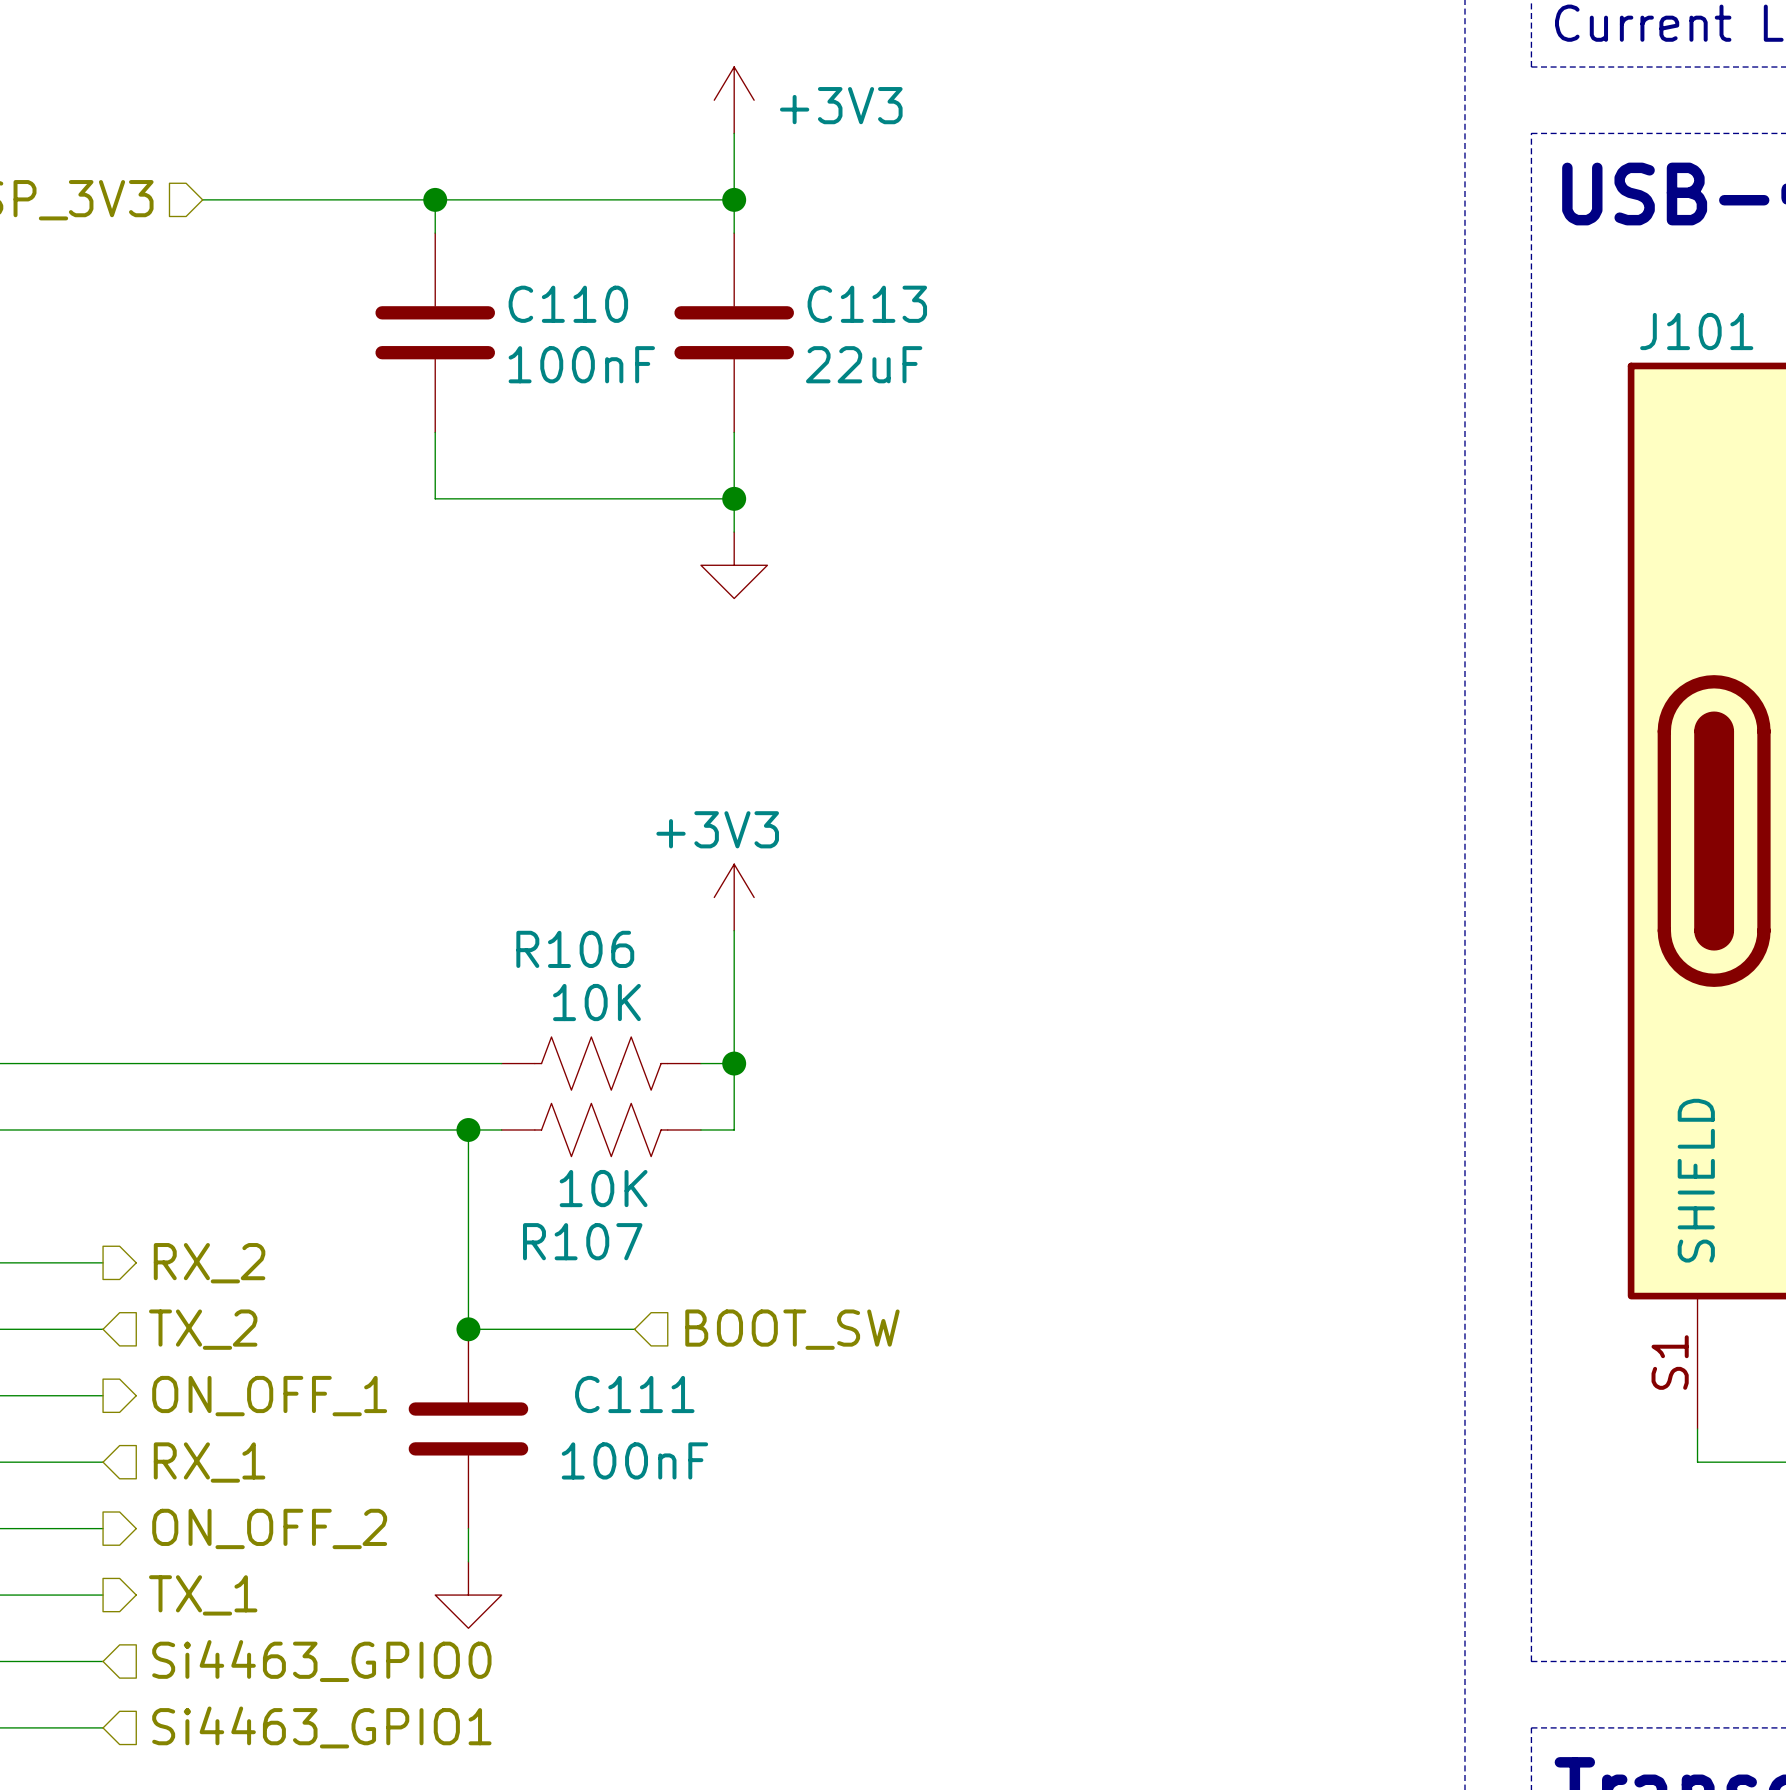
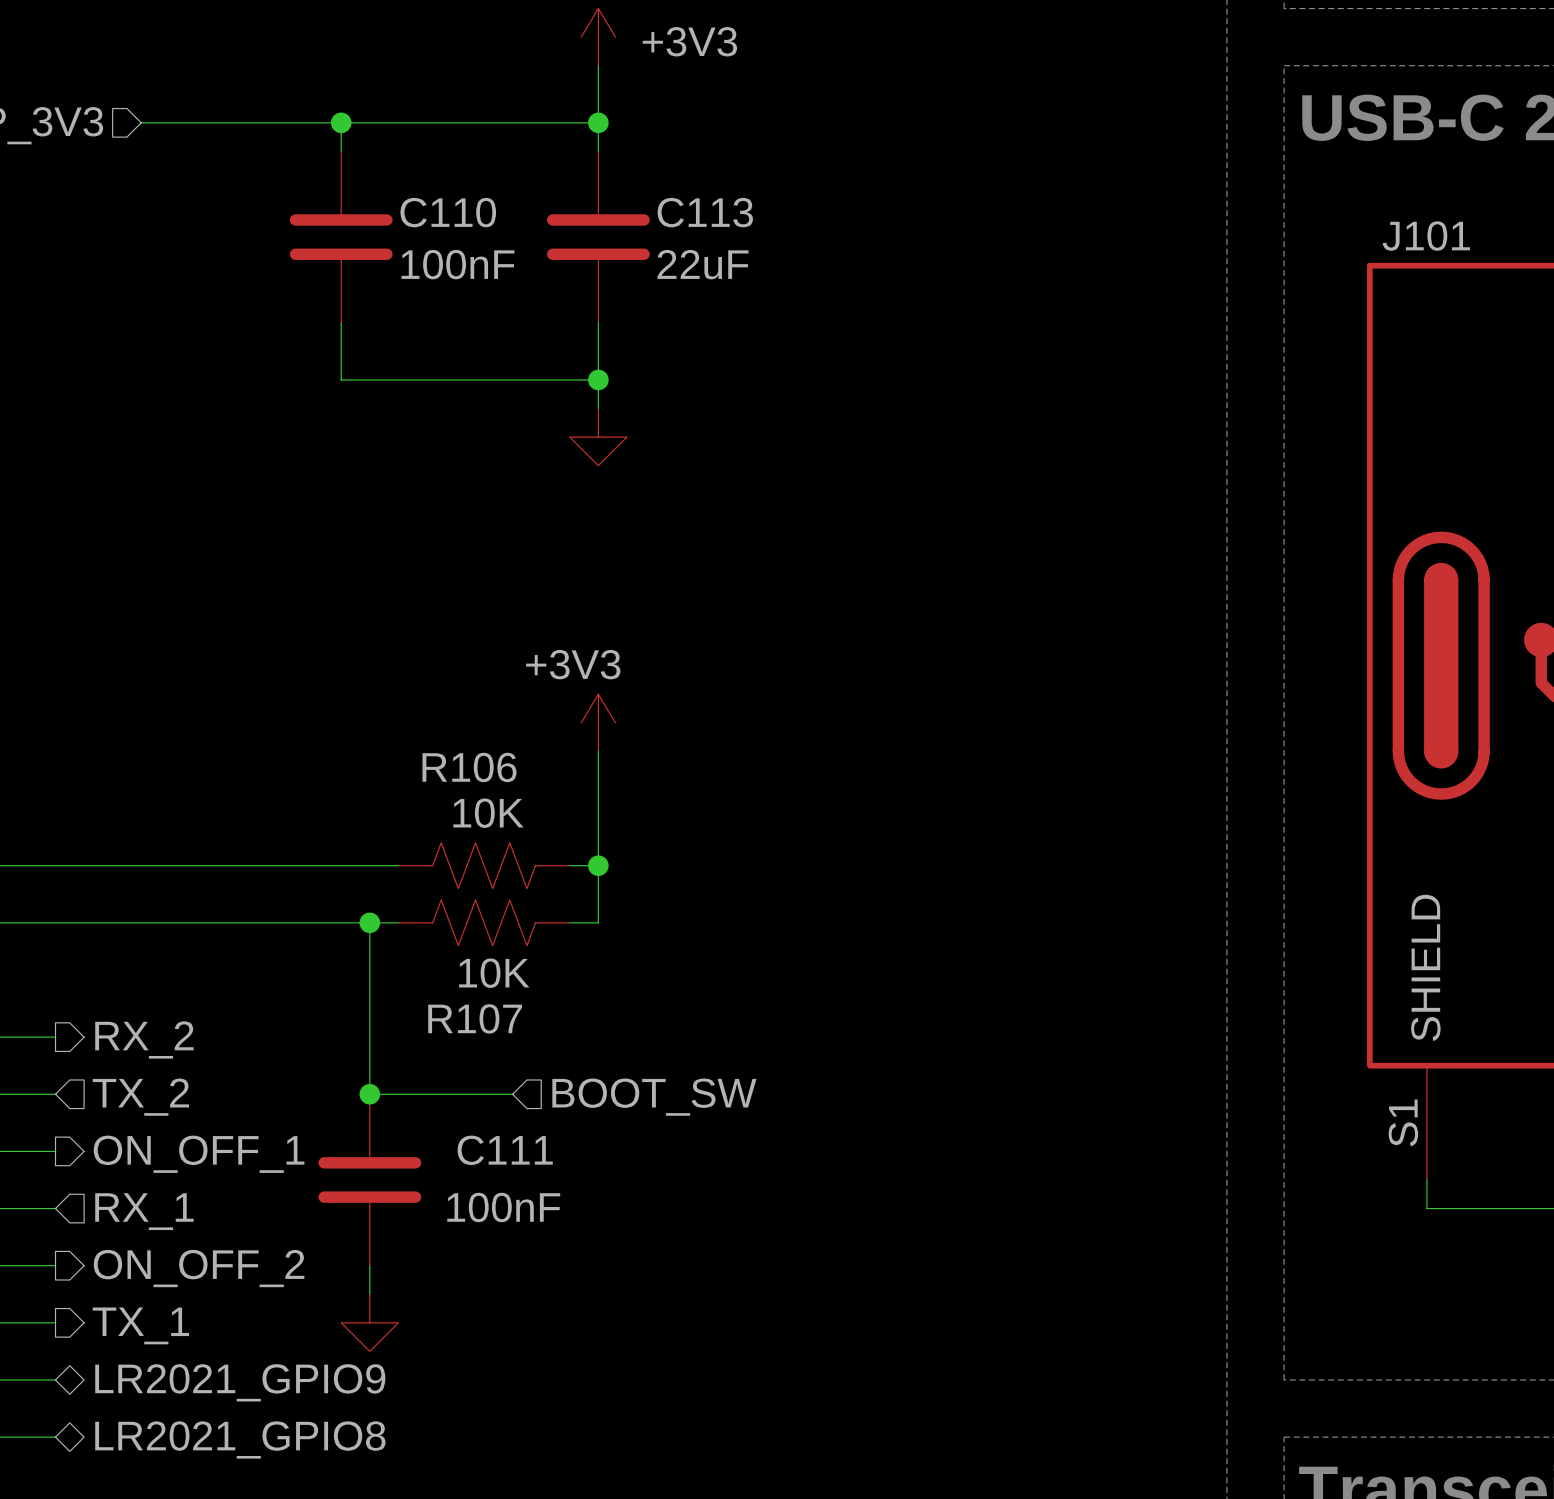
hierarchical label shape: input (321, 1661) -> bidirectional (240, 1382)
hierarchical label: Si4463_GPIO0 (321, 1661) -> LR2021_GPIO9 (240, 1382)
hierarchical label shape: input (321, 1727) -> bidirectional (240, 1439)
hierarchical label: Si4463_GPIO1 (321, 1727) -> LR2021_GPIO8 (240, 1439)

